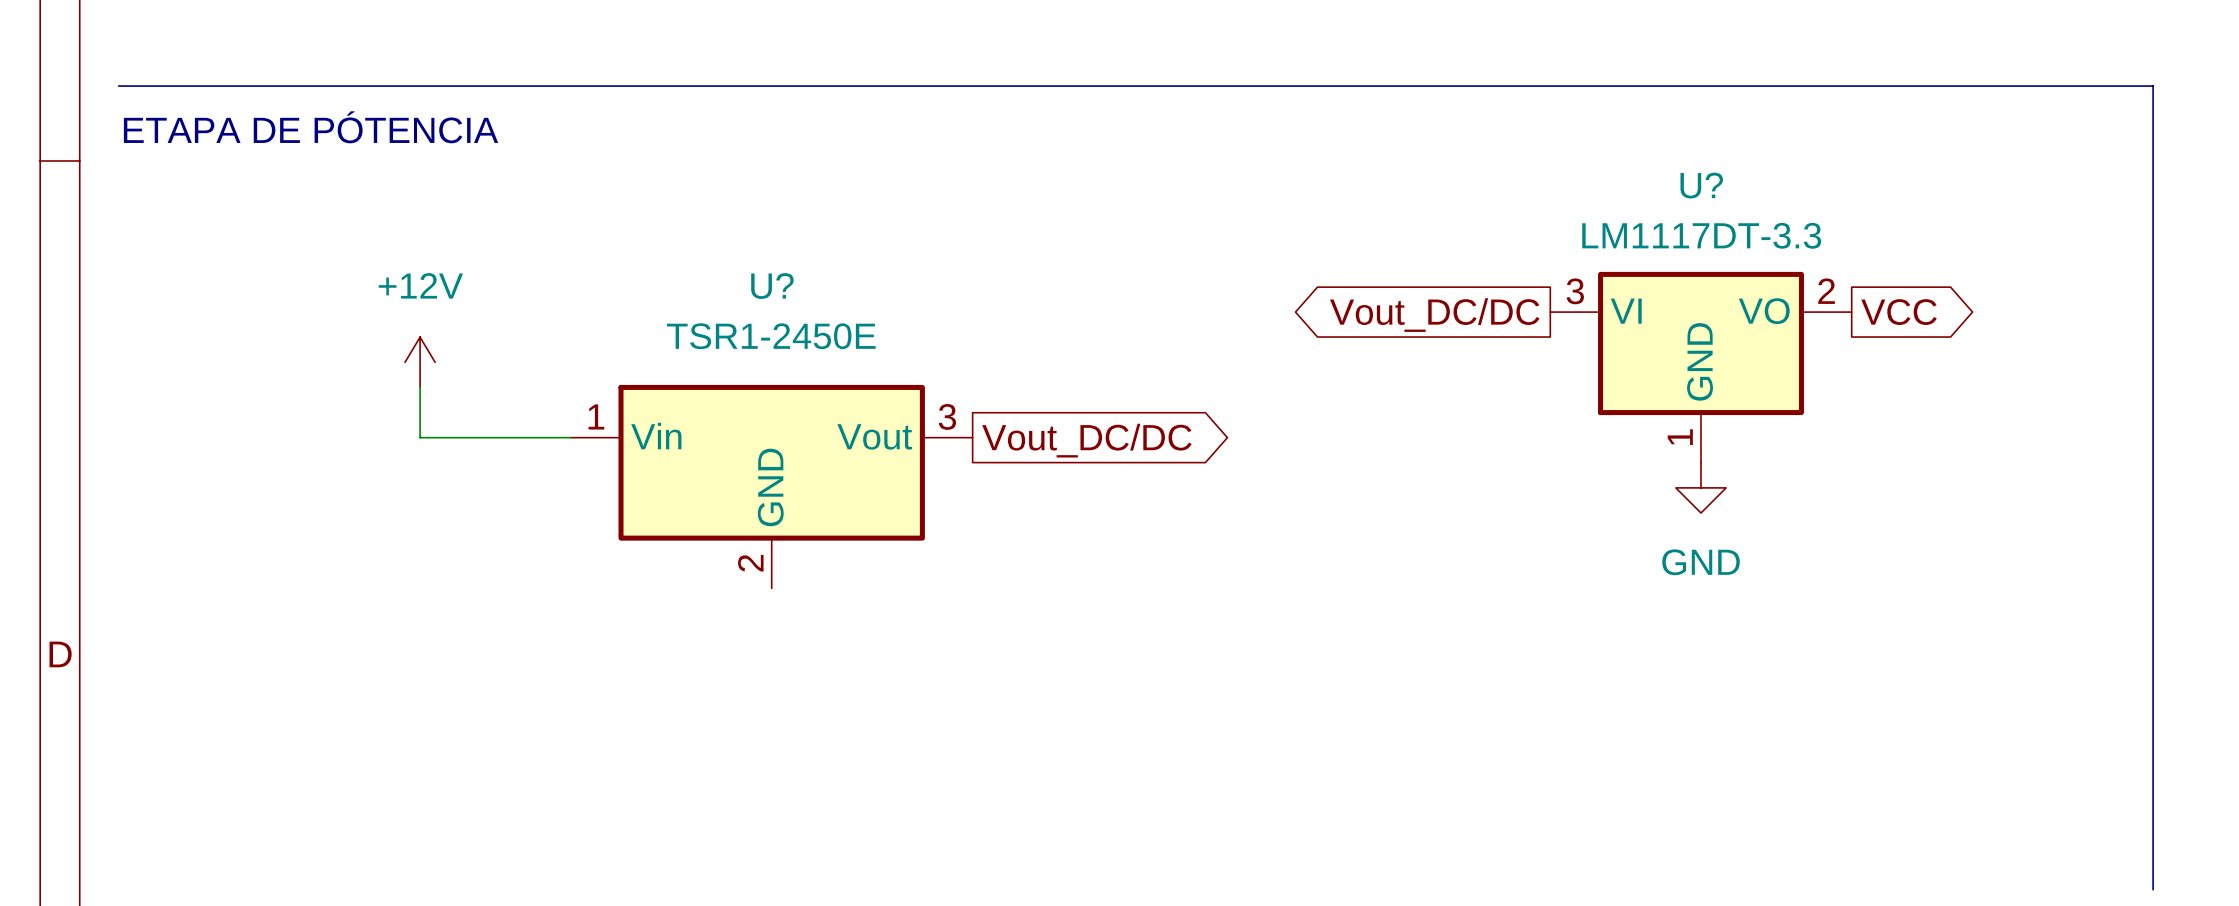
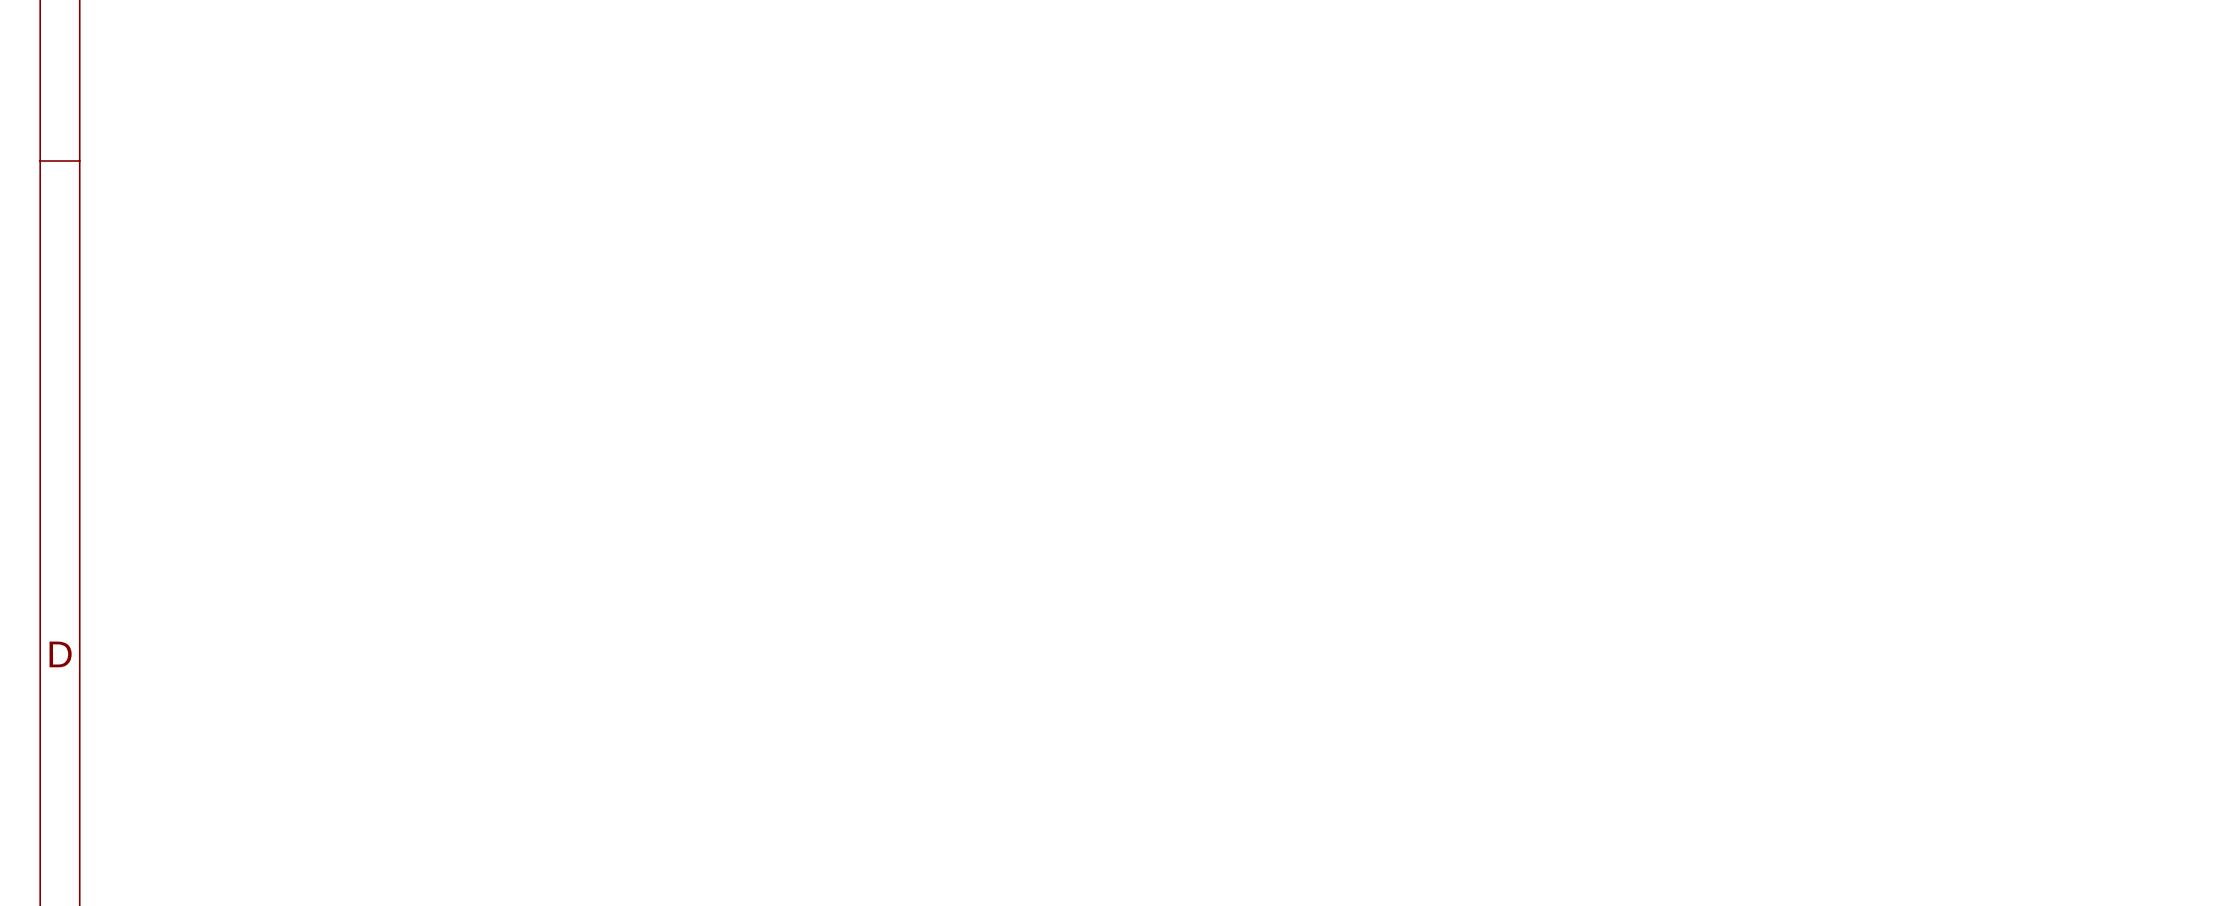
line: (118, 86) (2153, 86) (2153, 889) -> none
text: ETAPA DE PÓTENCIA (311, 127) -> none
global label: VCC (1899, 312) -> none
global label: Vout_DC/DC (1434, 315) -> none
power symbol: +12V (420, 362) -> none
U?: LM1117DT-3.3 (1700, 367) -> none
wire: (420, 387) (420, 437) (570, 437) -> none
global label: Vout_DC/DC (1086, 440) -> none
U?: TSR1-2450E (771, 486) -> none
power symbol: GND (1700, 487) -> none

